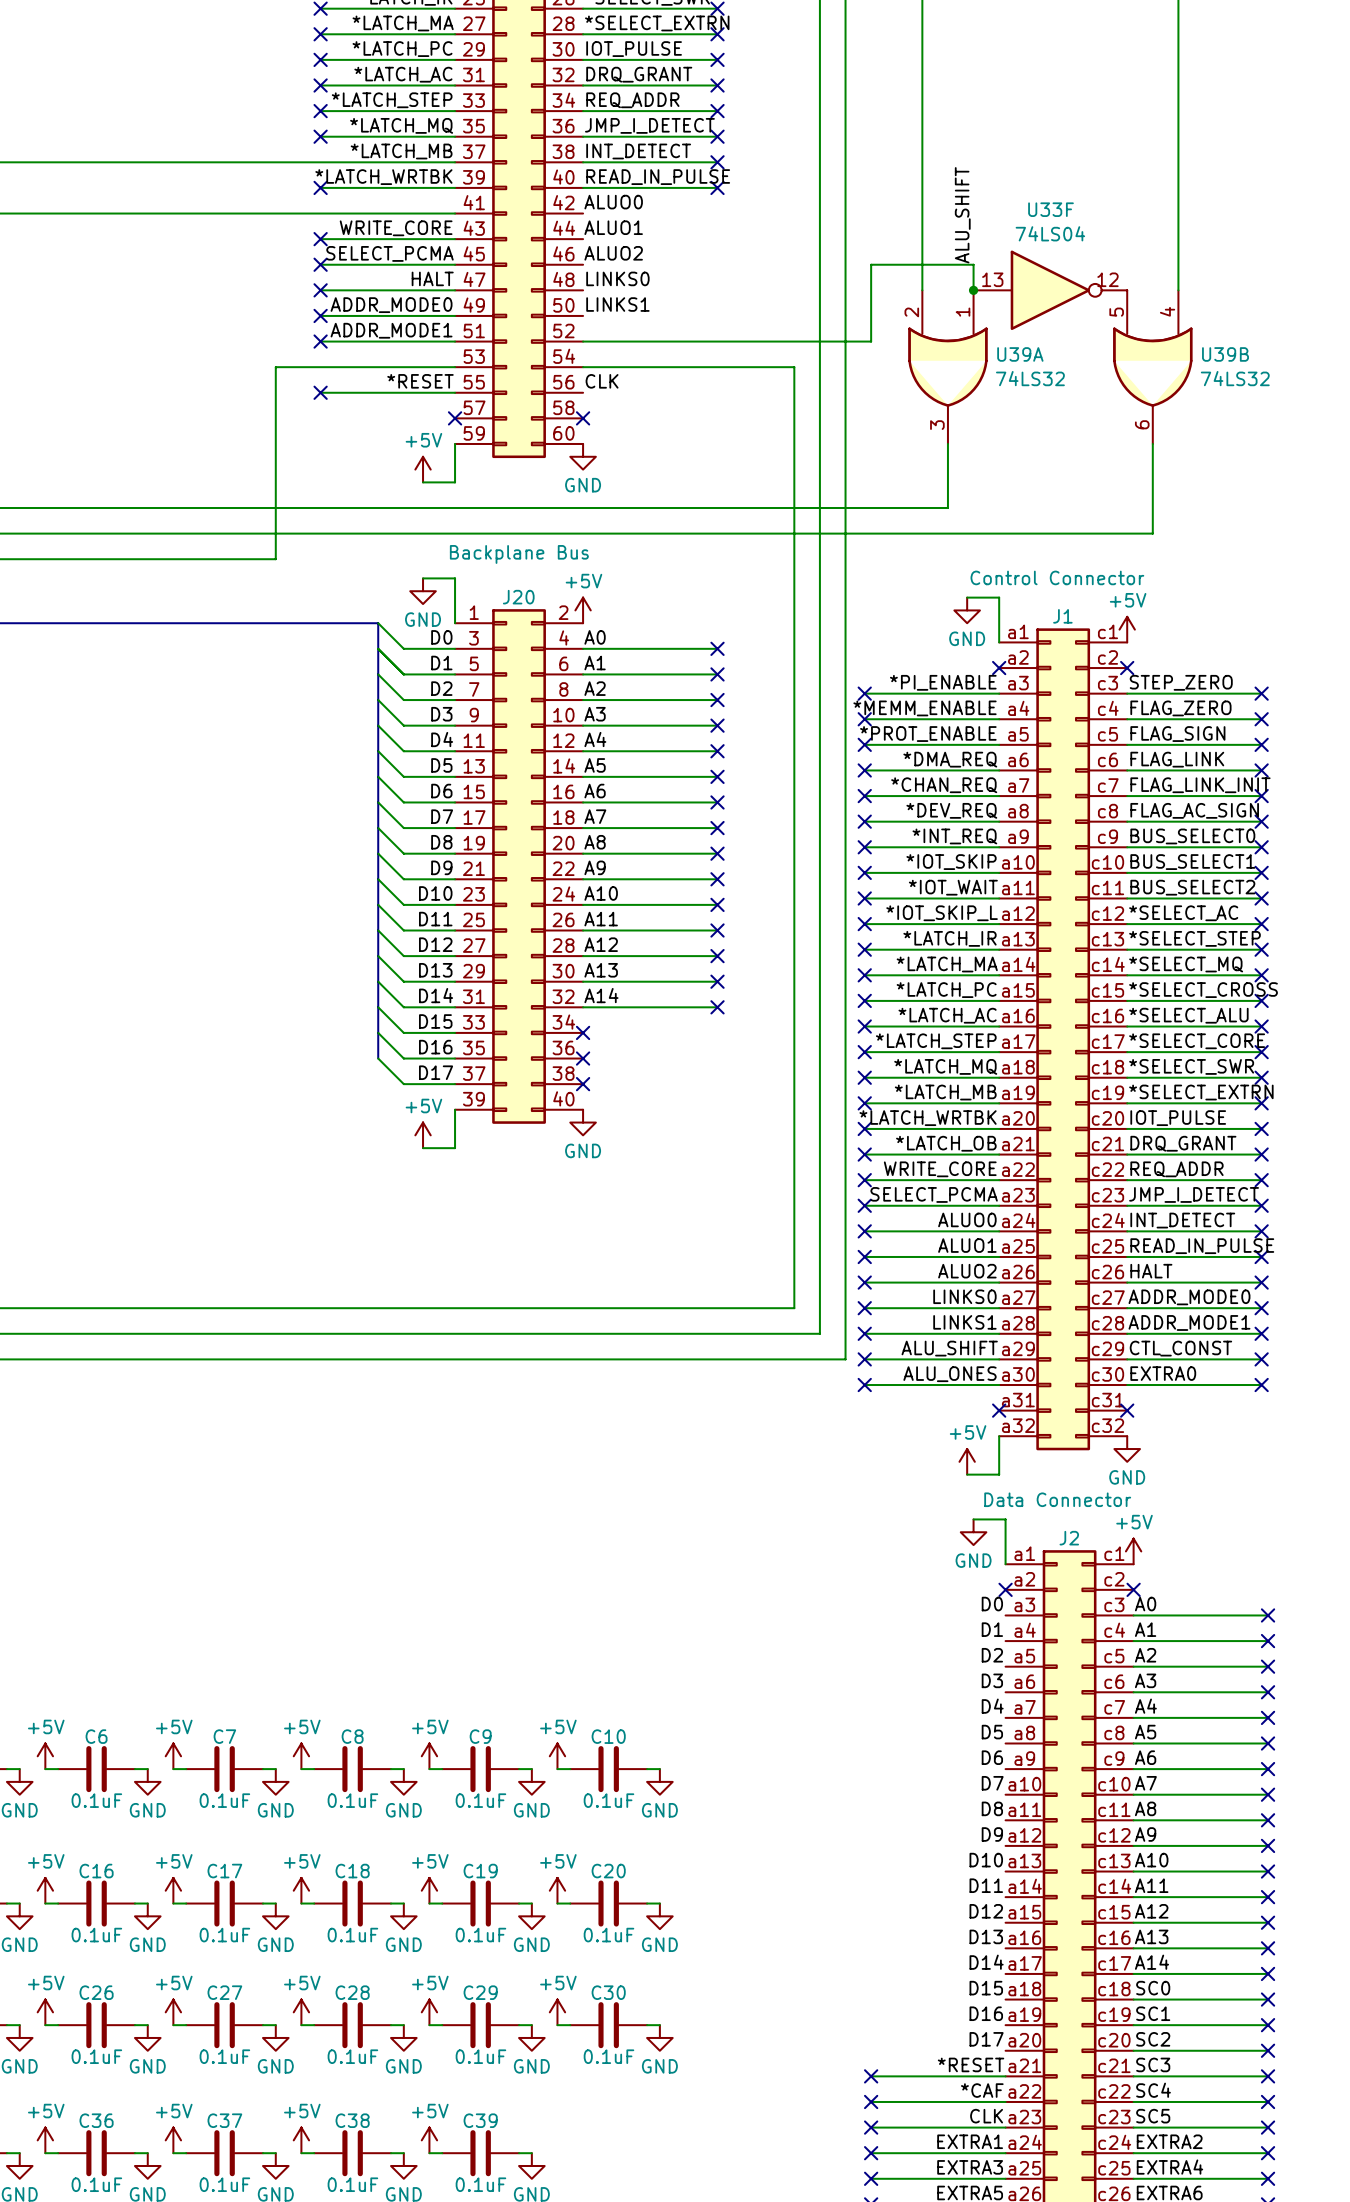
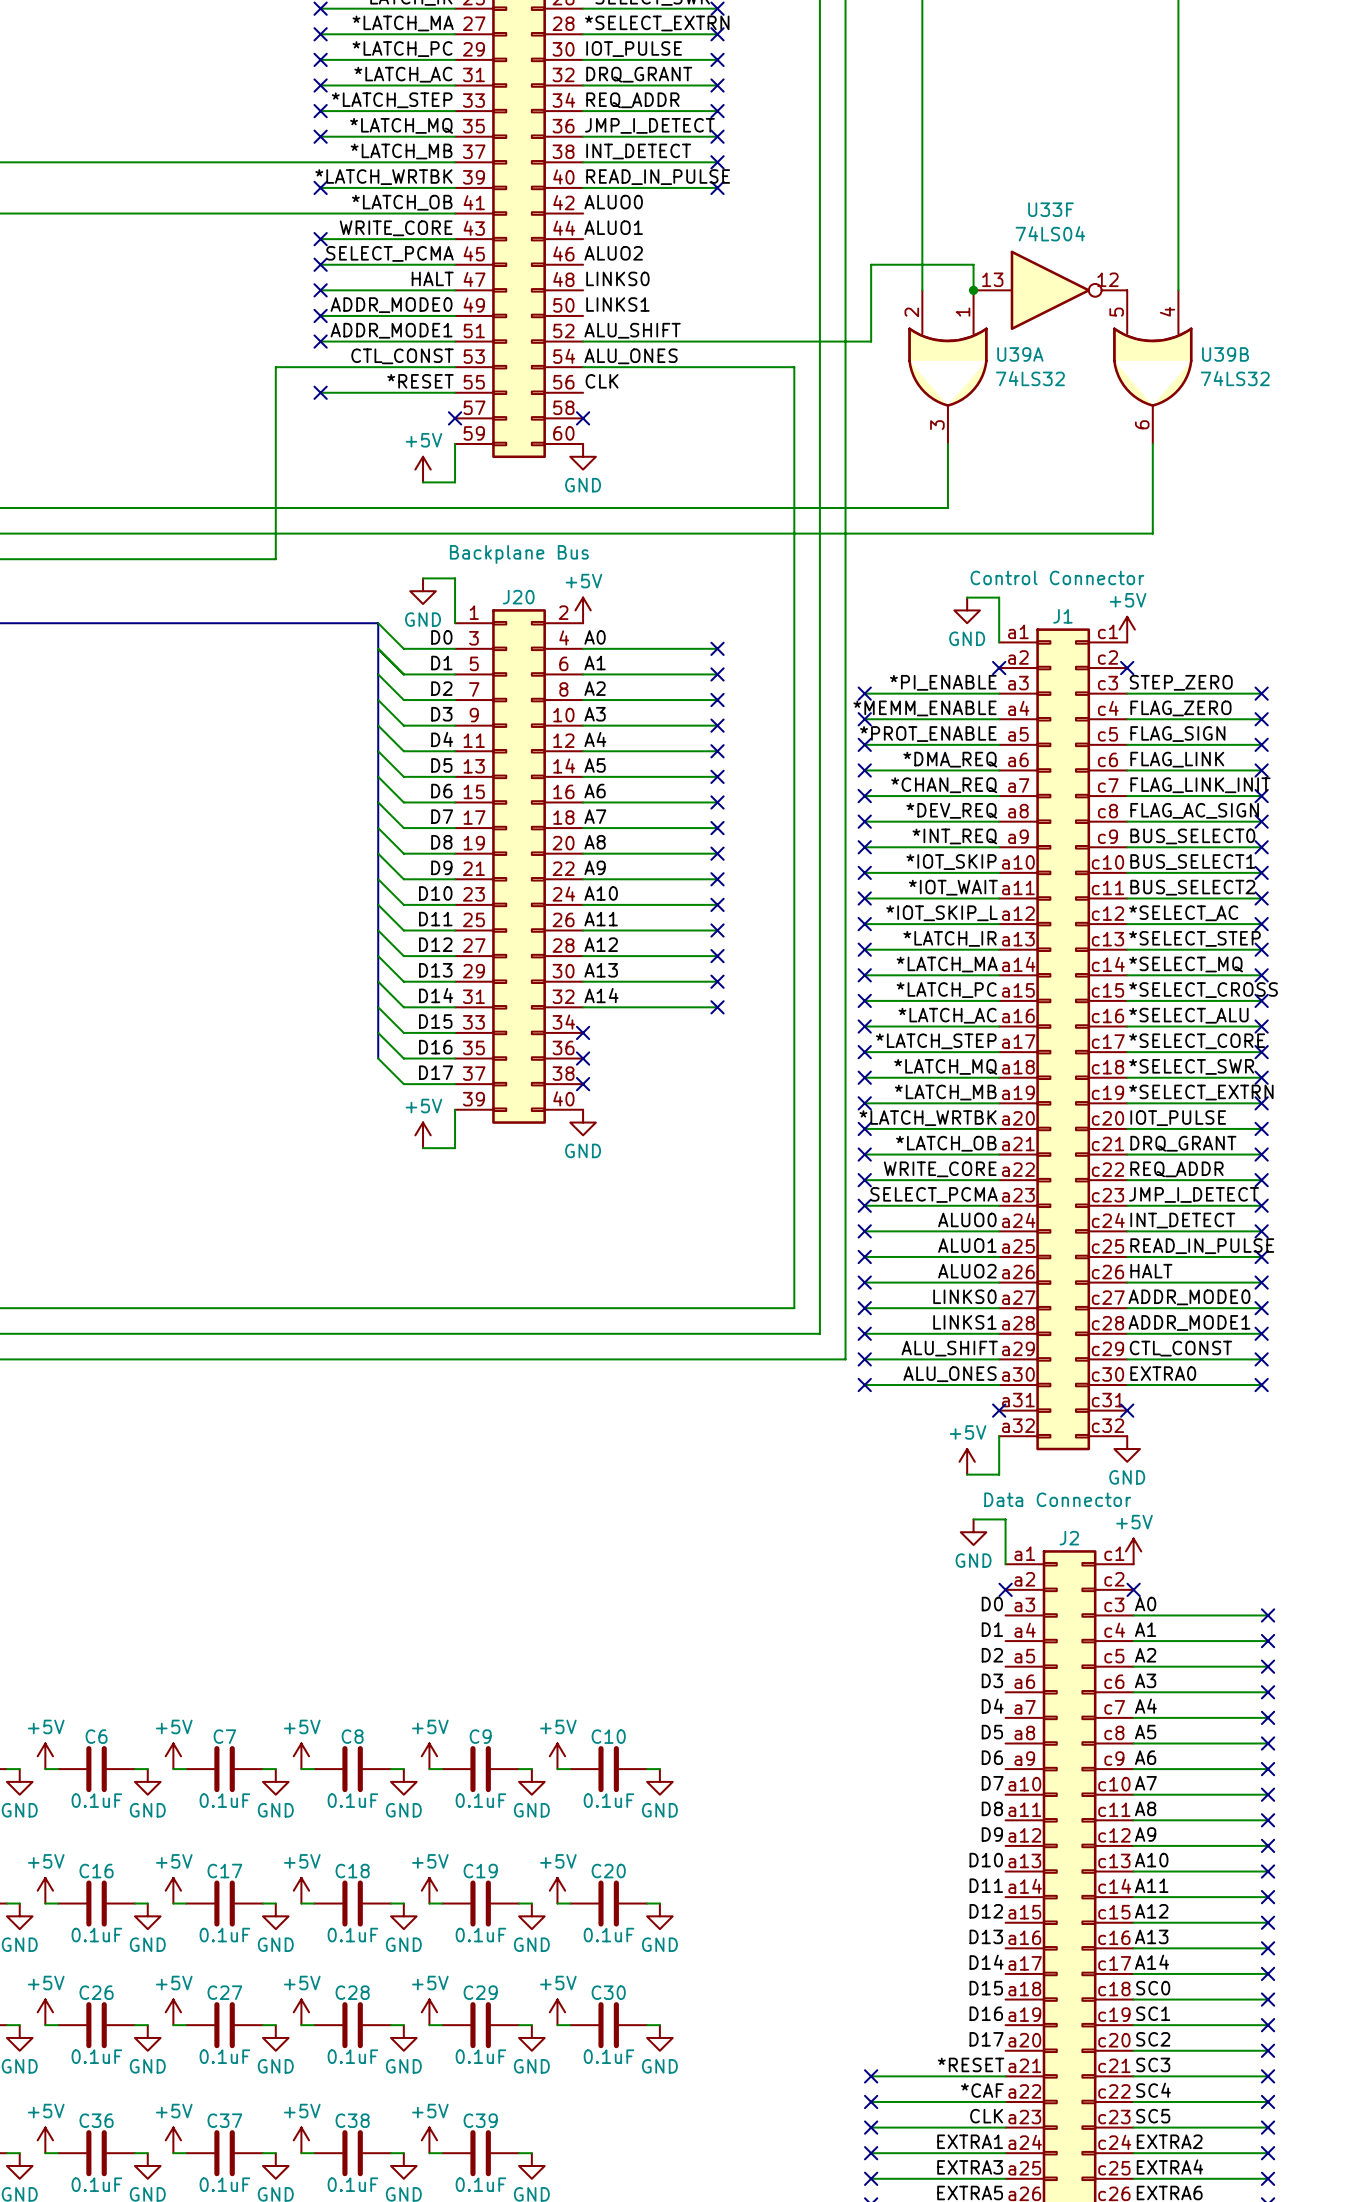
label: none -> *LATCH_OB (402, 202)
label: ALU_SHIFT (962, 215) -> none
label: none -> ALU_SHIFT (632, 330)
label: none -> CTL_CONST (402, 356)
label: none -> ALU_ONES (631, 356)

